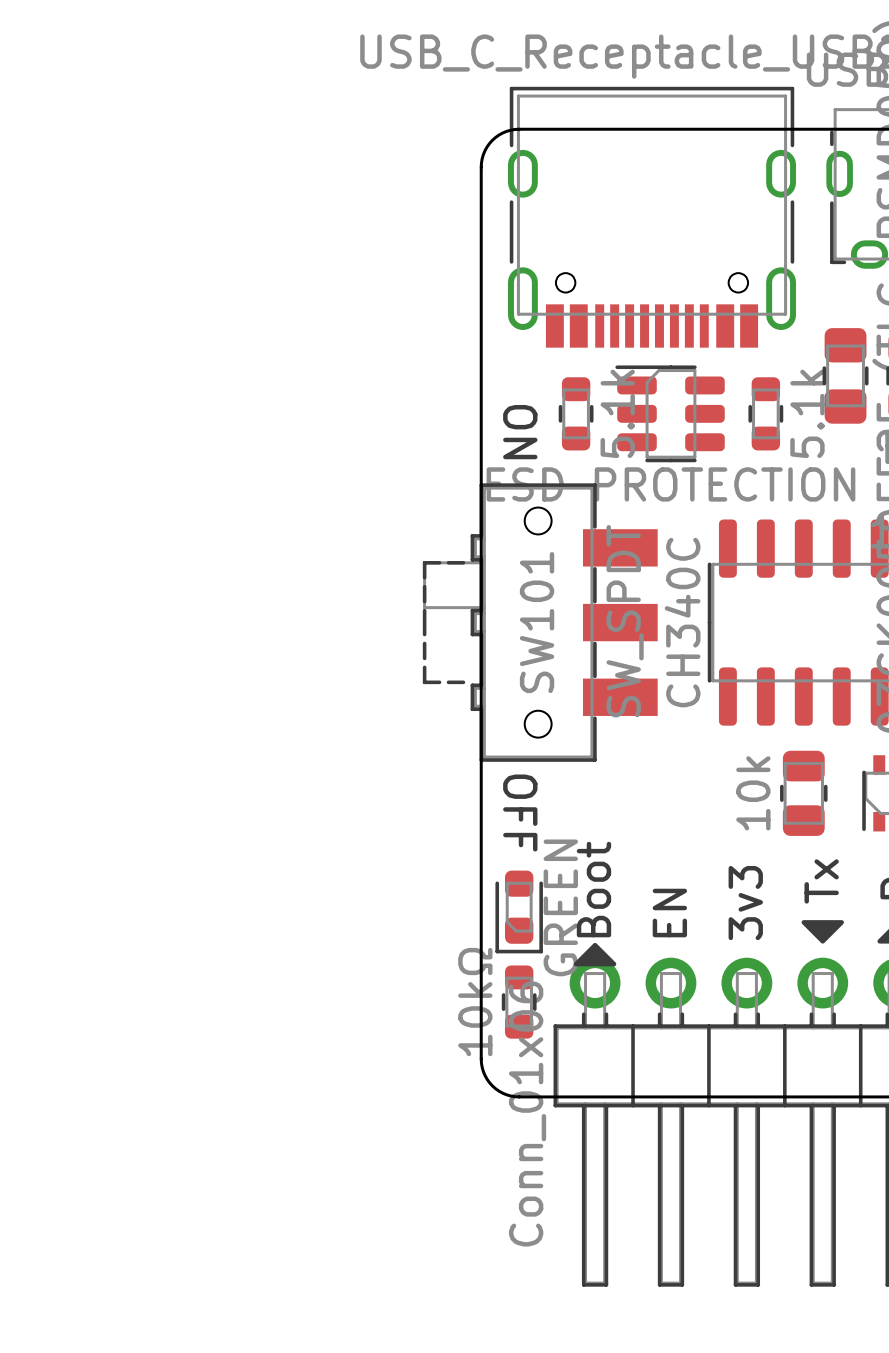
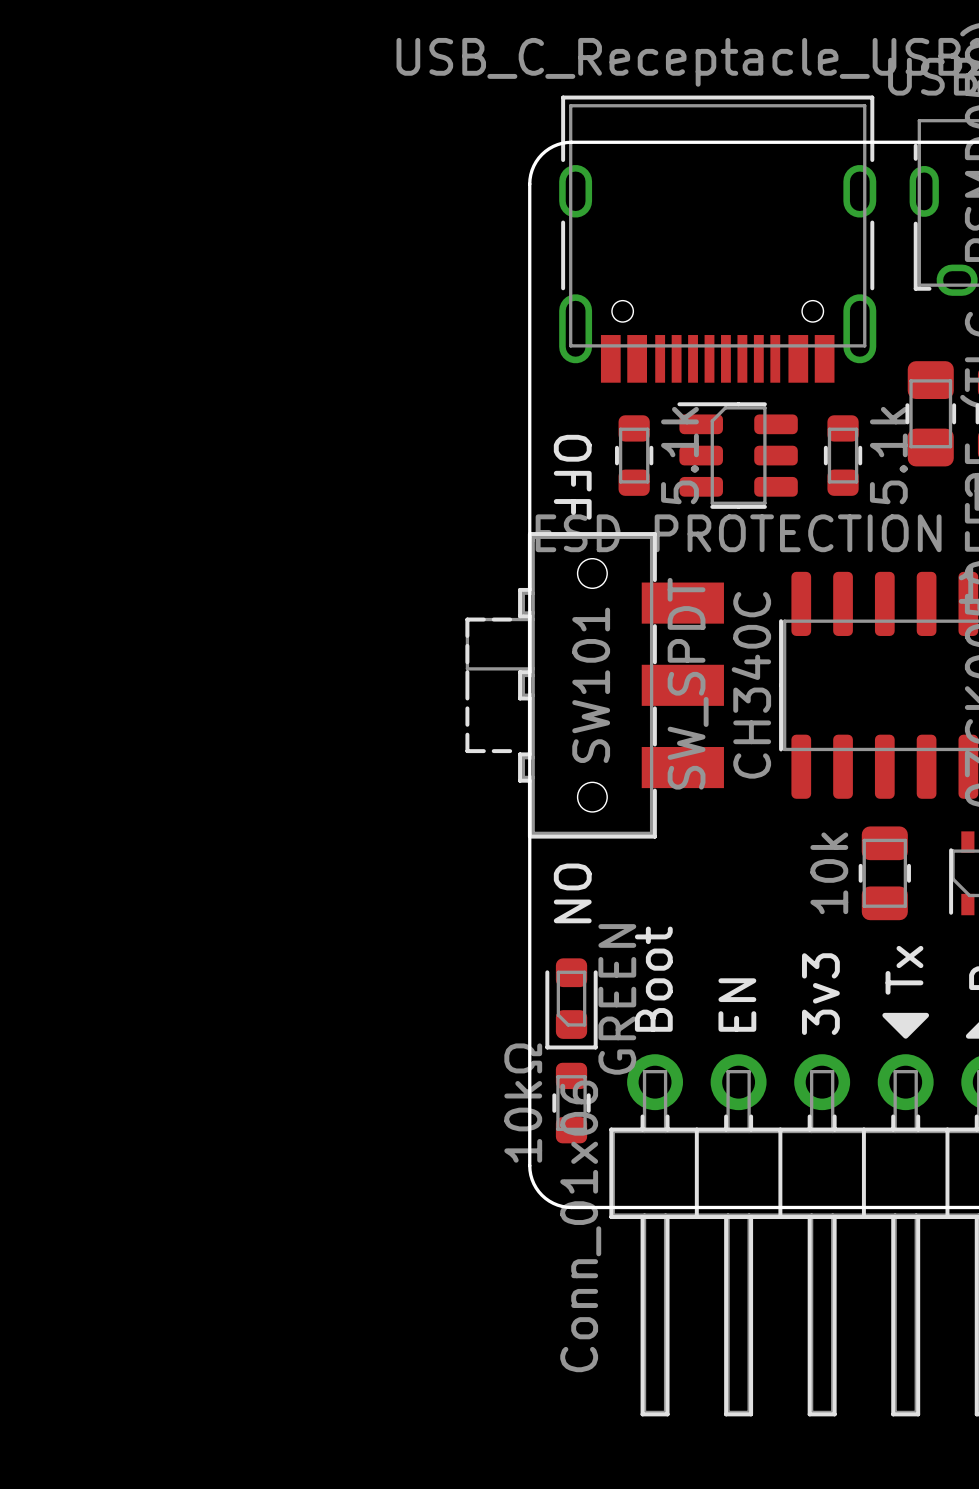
text: ON (520, 432) -> OFF (572, 477)
text: OFF (520, 813) -> ON (572, 893)
drawing: [573, 942, 617, 967] -> none

